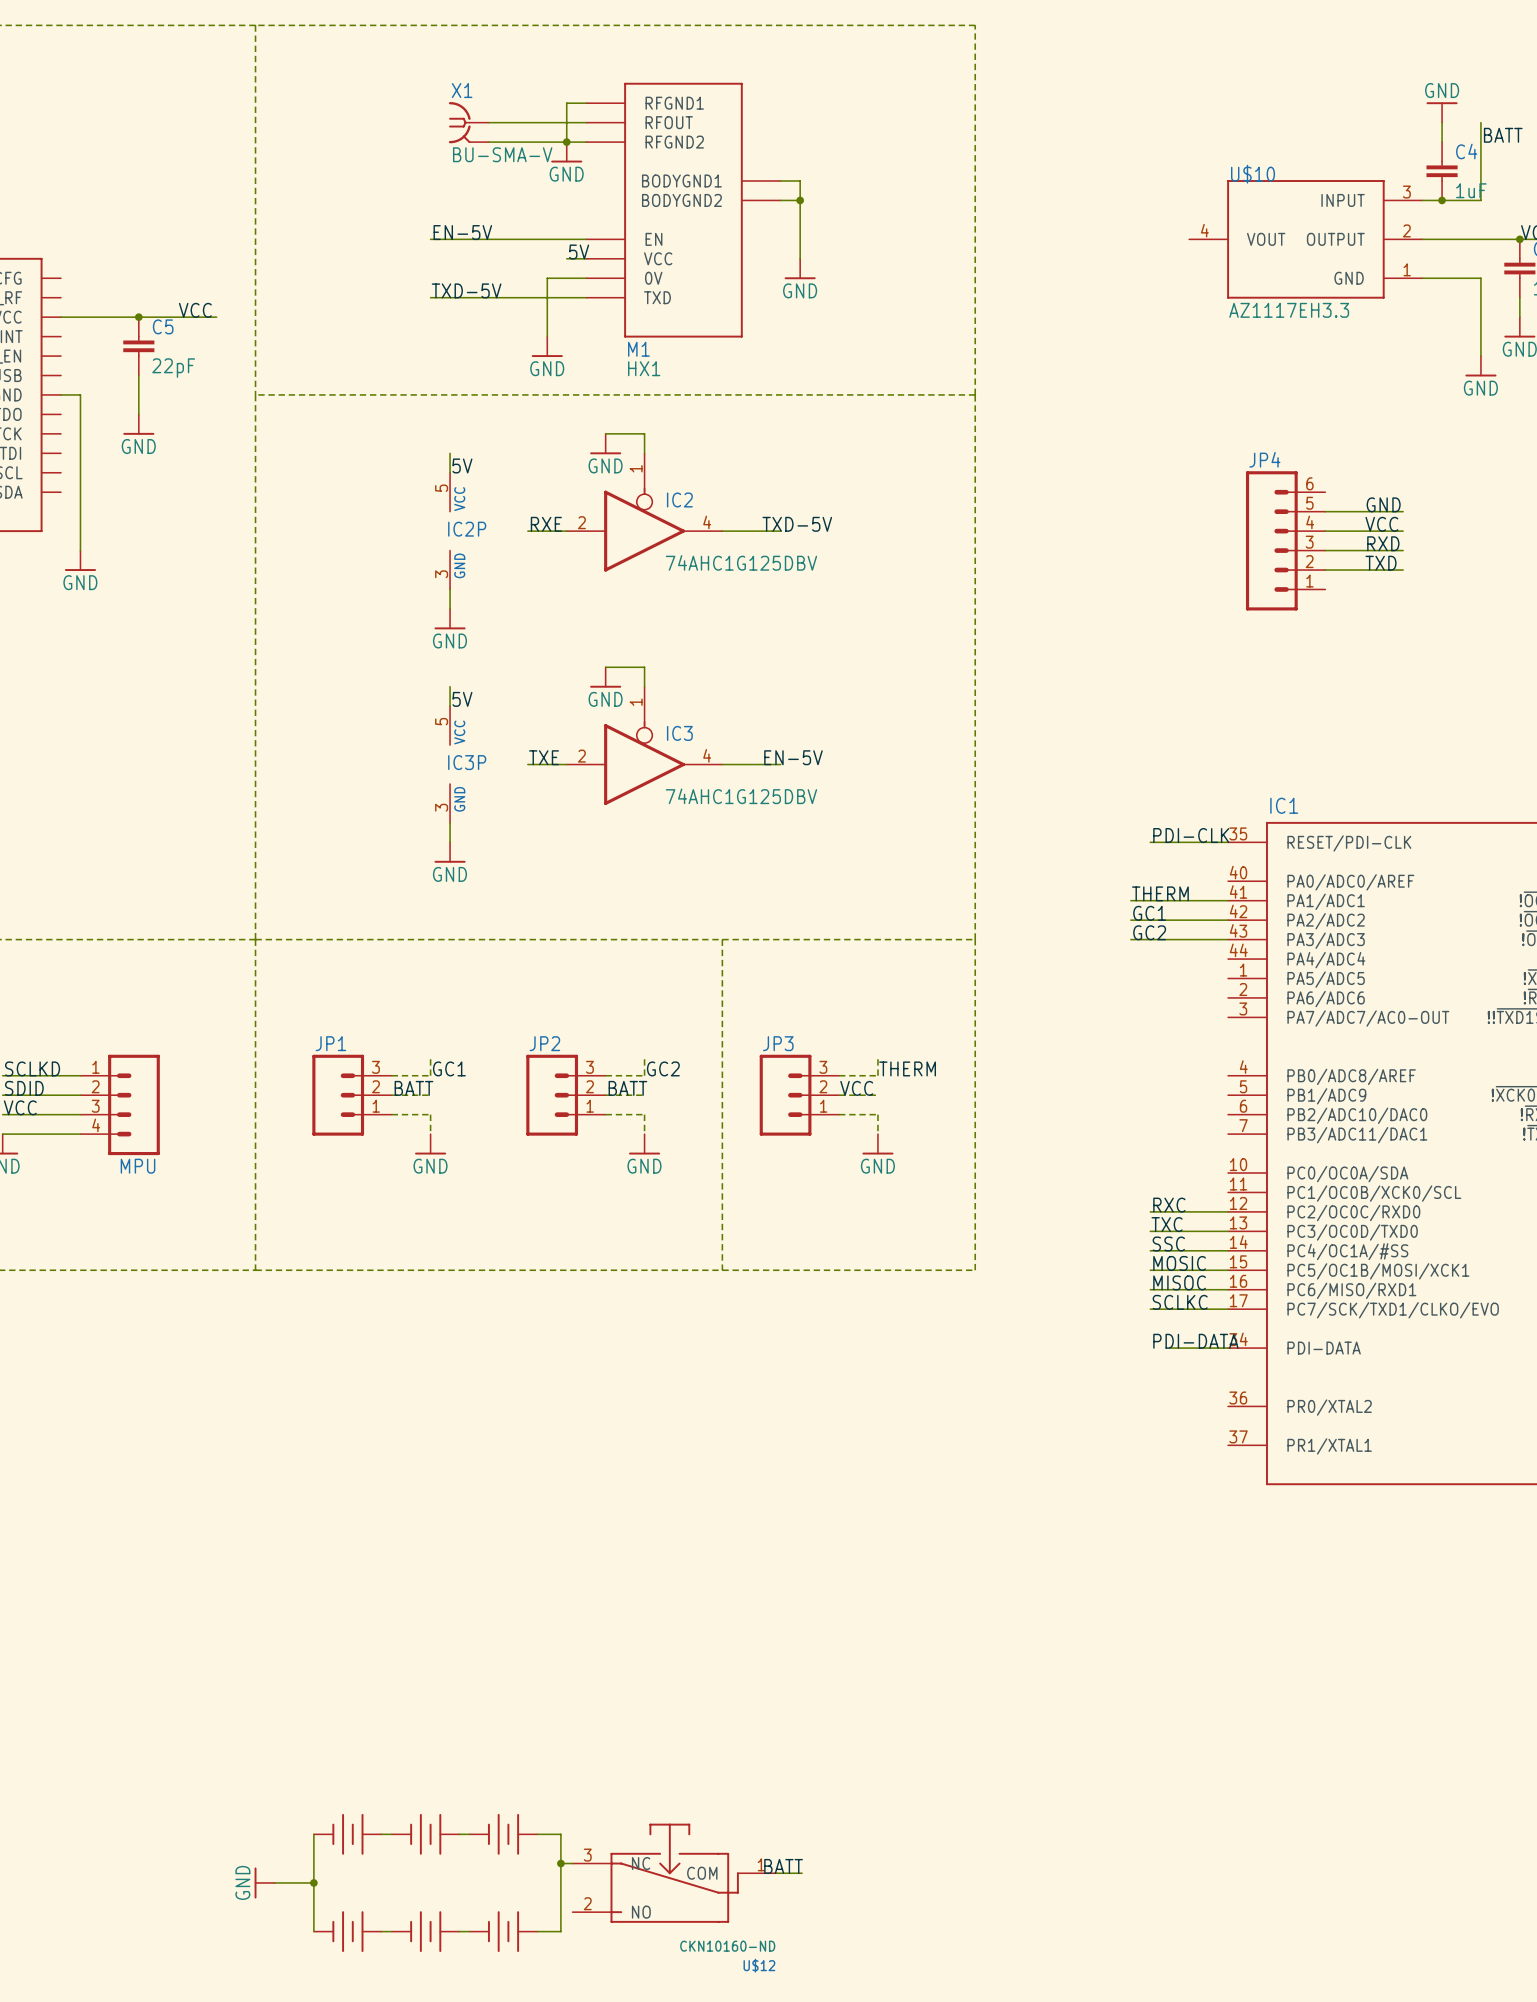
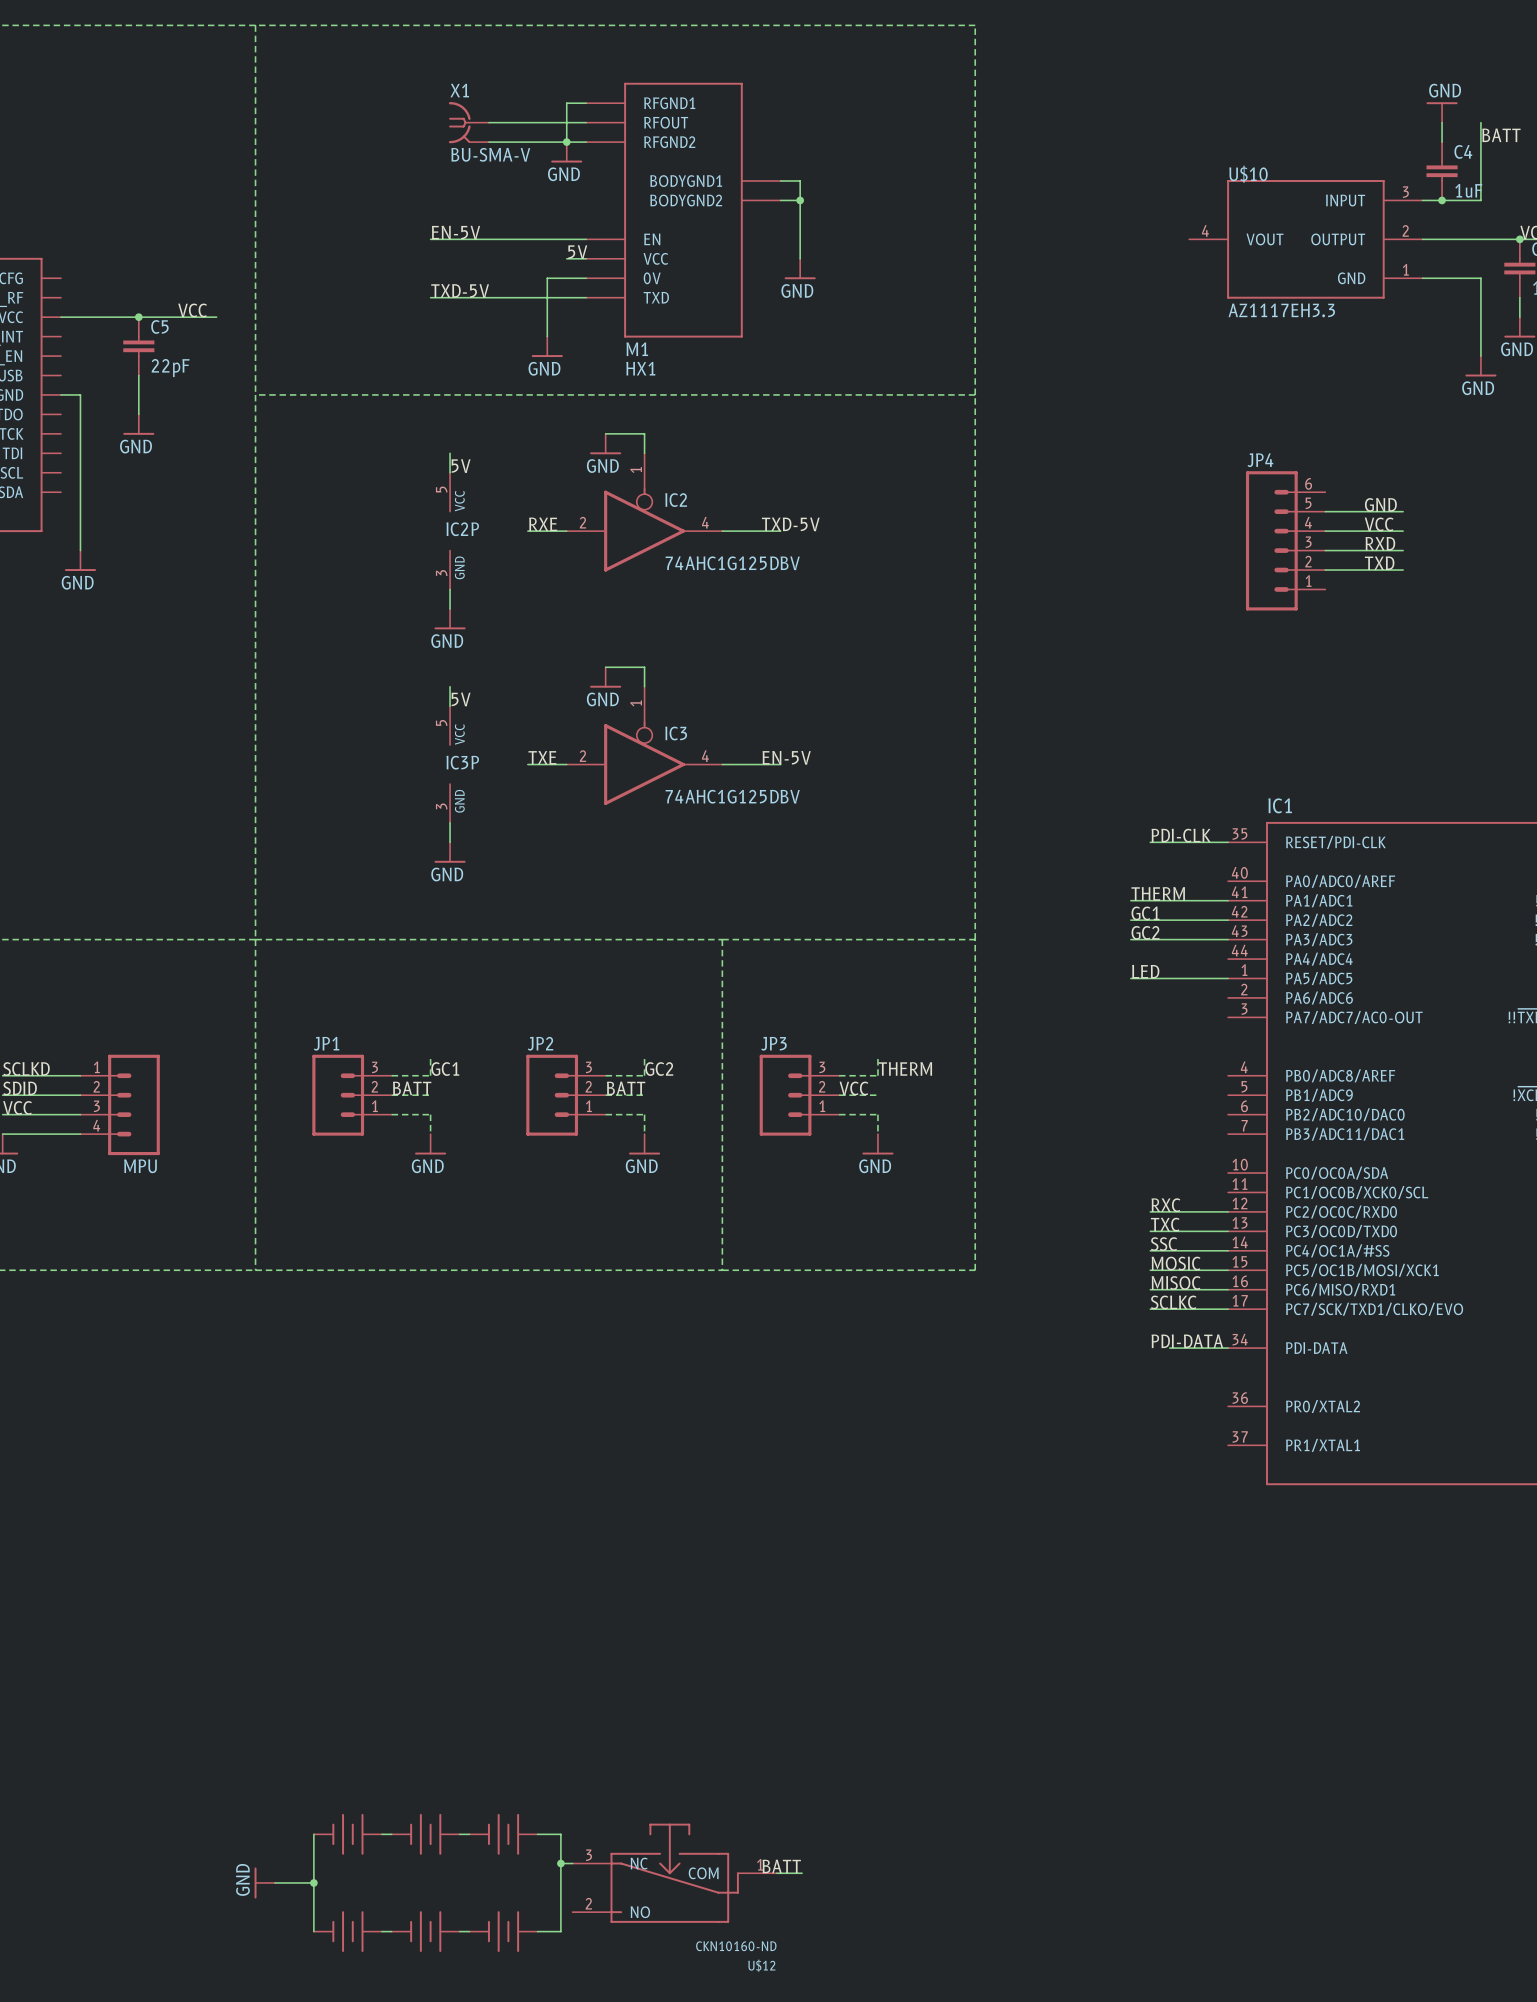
label: none -> LED (1145, 971)
wire: none -> (1130, 978) (1228, 978)

